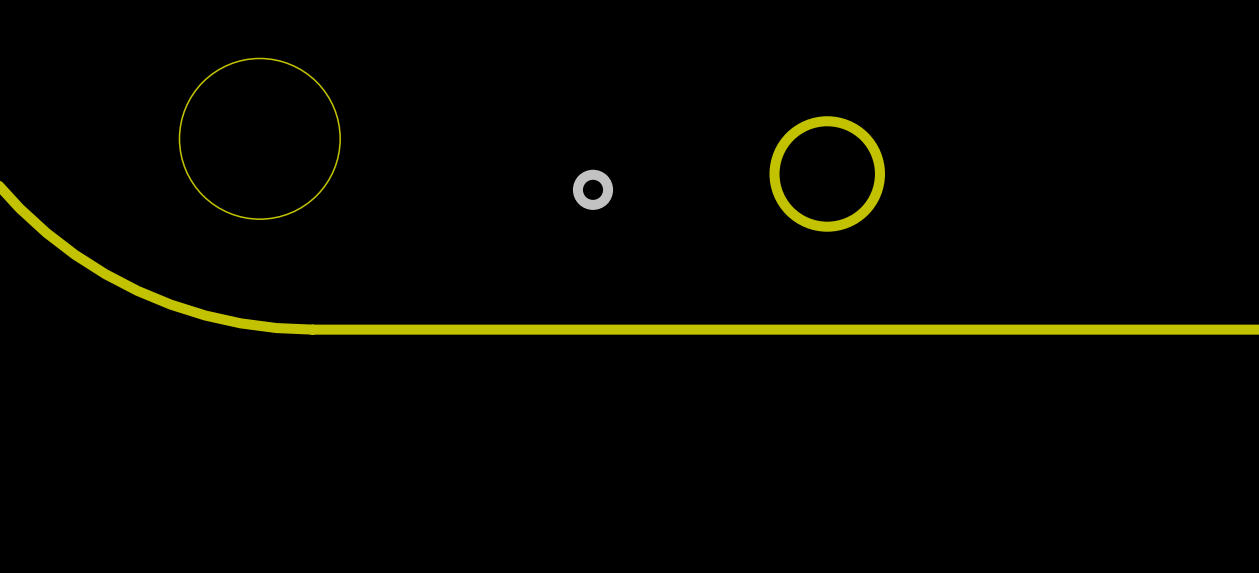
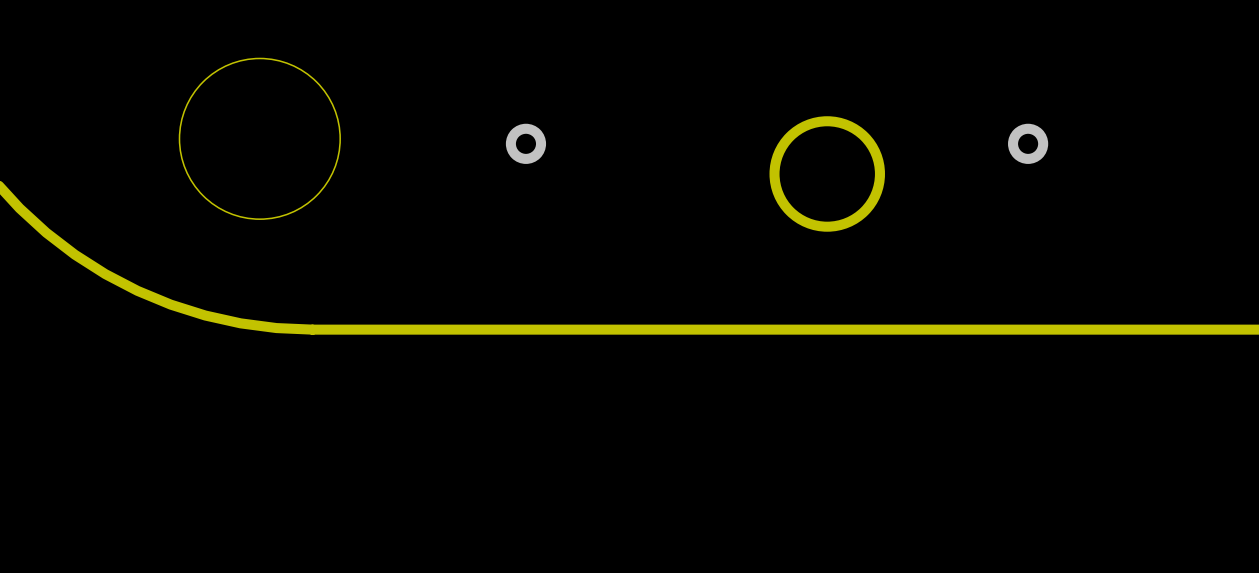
via: none -> (1028, 143)
via position: (593, 189) -> (525, 143)

